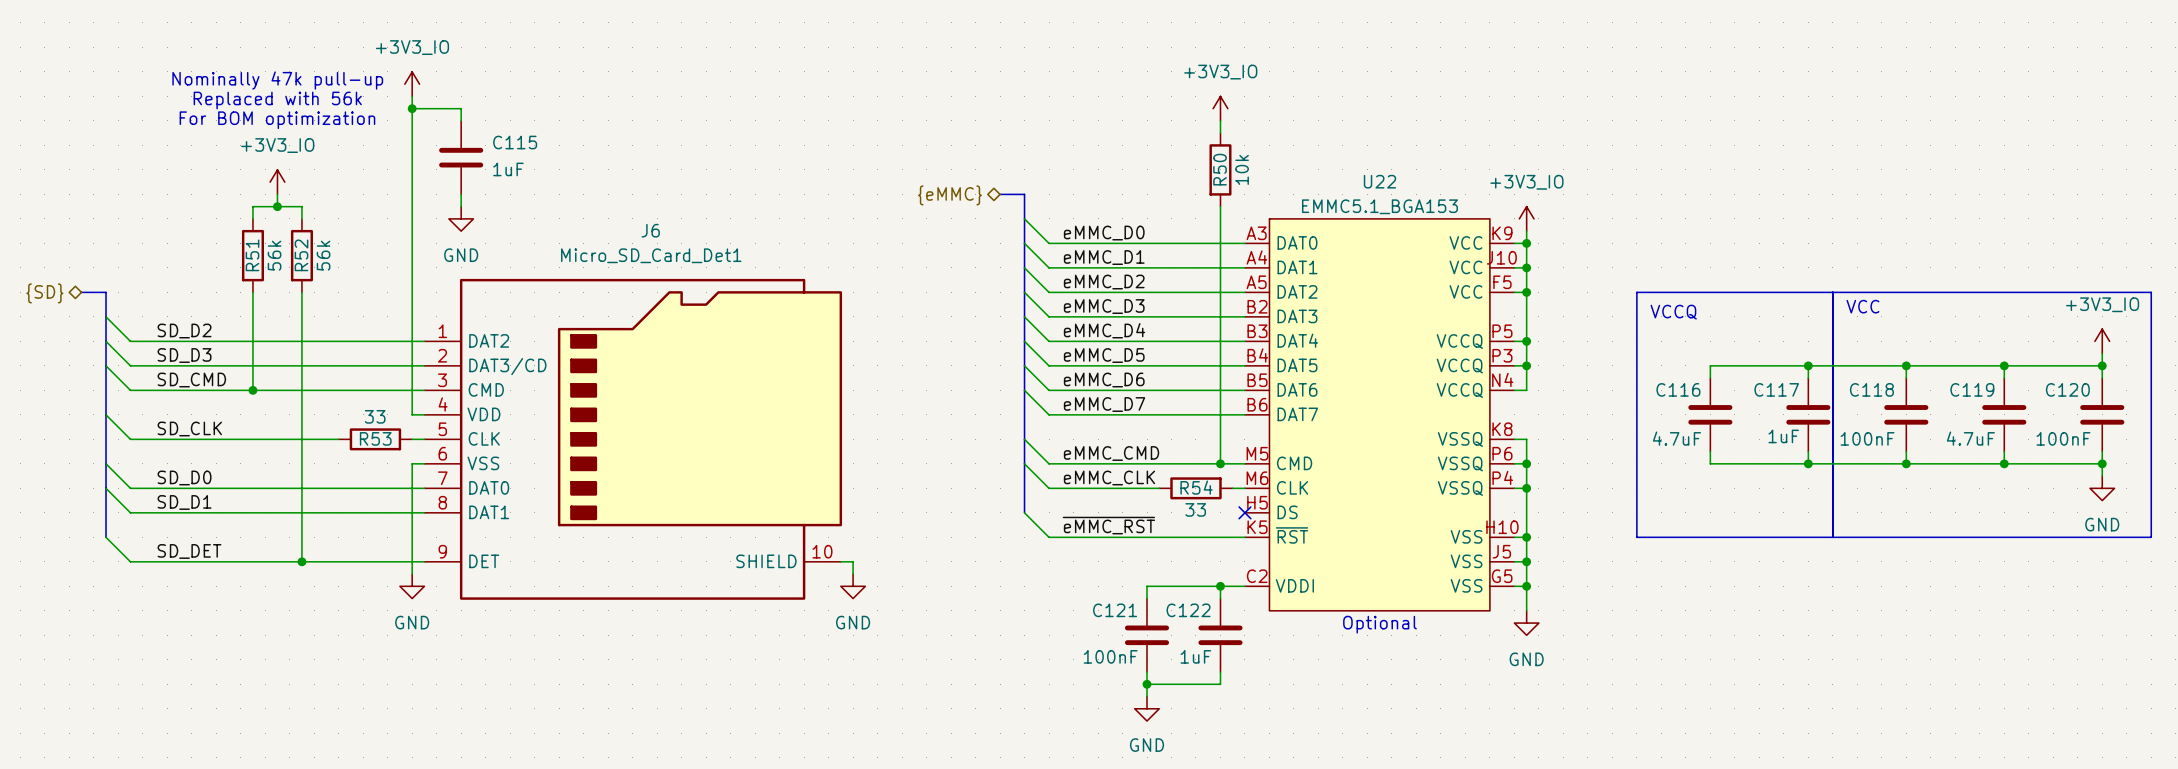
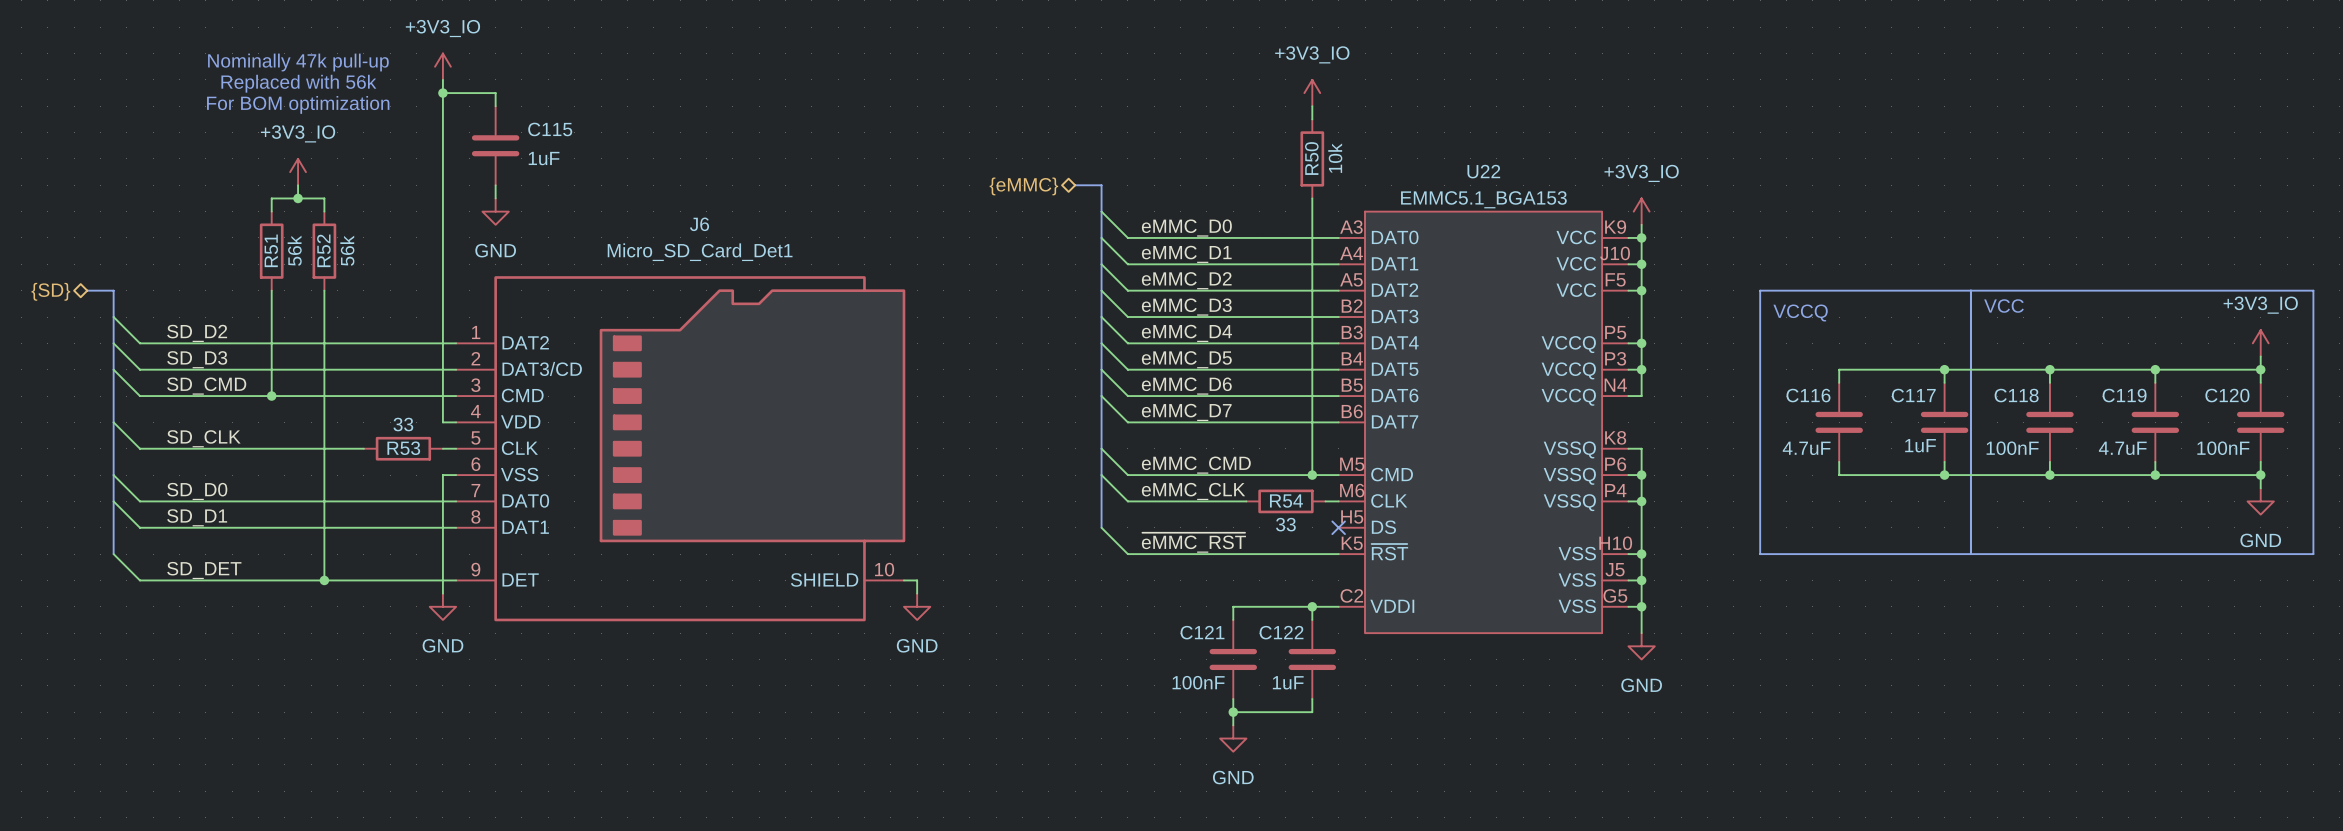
text: Optional (1379, 624) -> none

